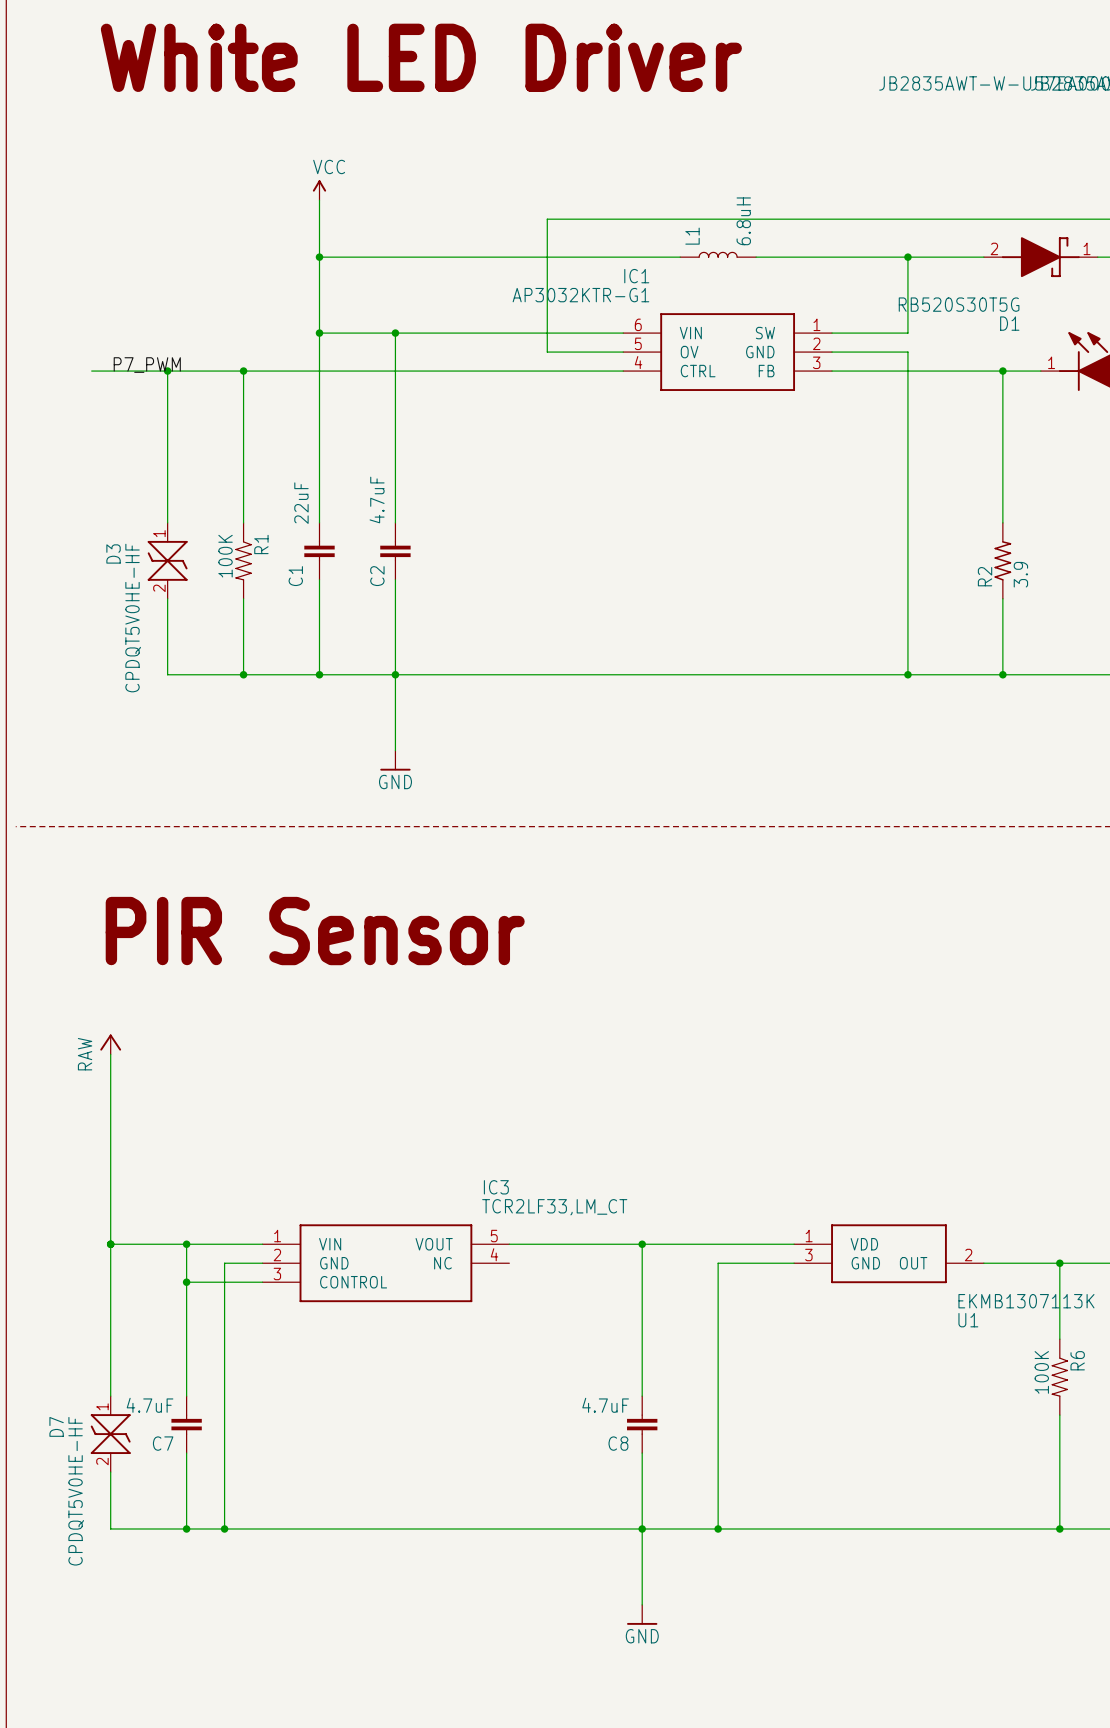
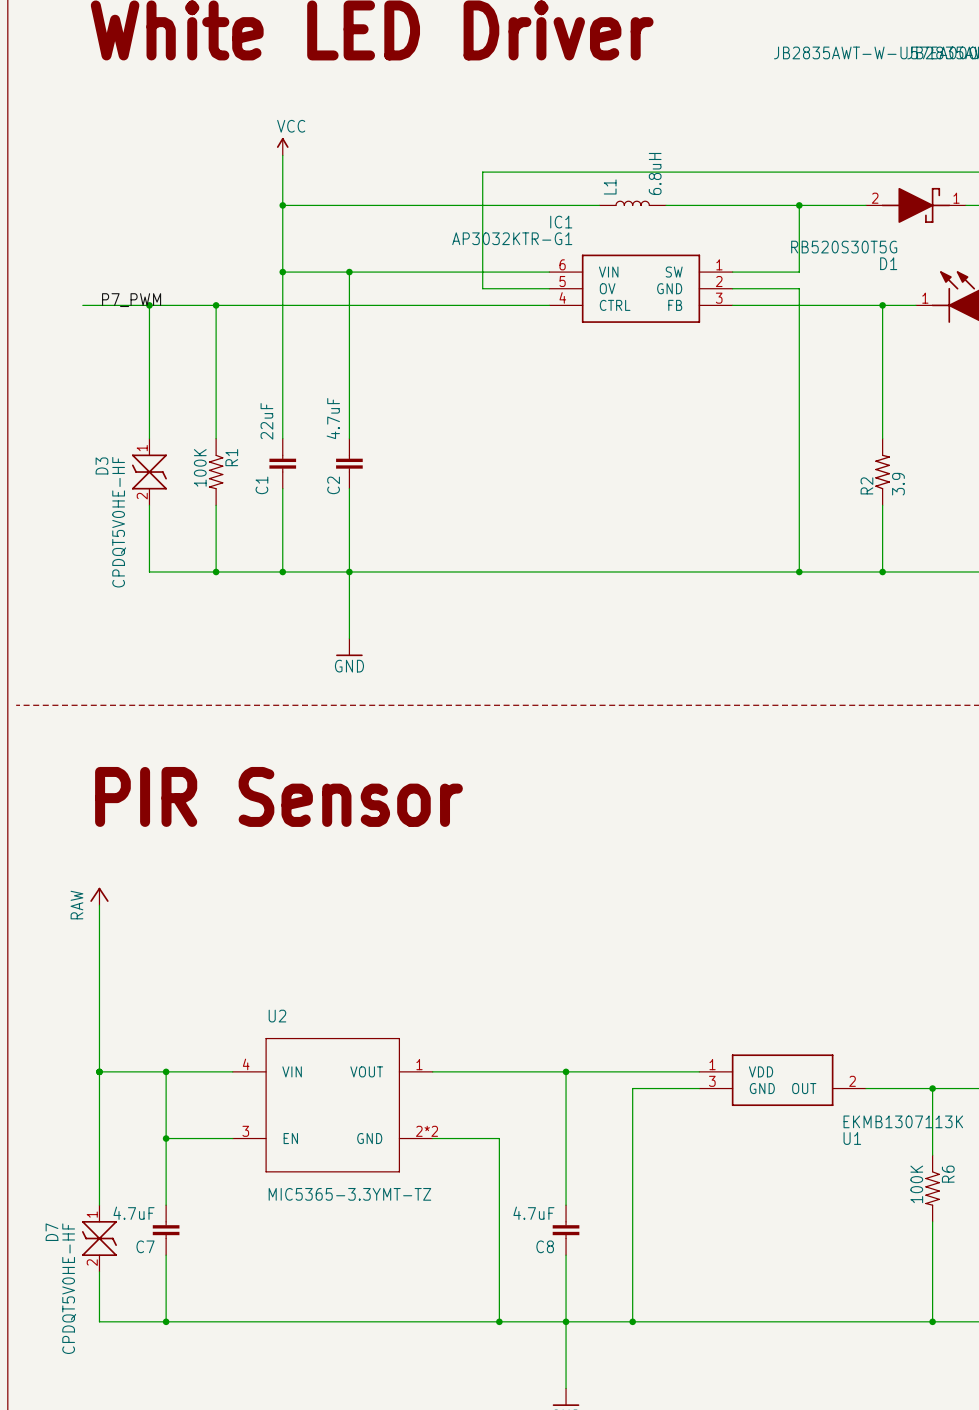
wire: (262, 1263) (224, 1263) (224, 1528) -> none
IC3: TCR2LF33,LM_CT (385, 1263) -> none
wire: (186, 1282) (262, 1282) -> (166, 1138) (232, 1138)
junction position: (186, 1282) -> (166, 1138)
U2: none -> MIC5365-3.3YMT-TZ (332, 1105)
wire: none -> (432, 1138) (499, 1138) (499, 1321)
junction: (224, 1528) -> none
junction: none -> (499, 1321)

